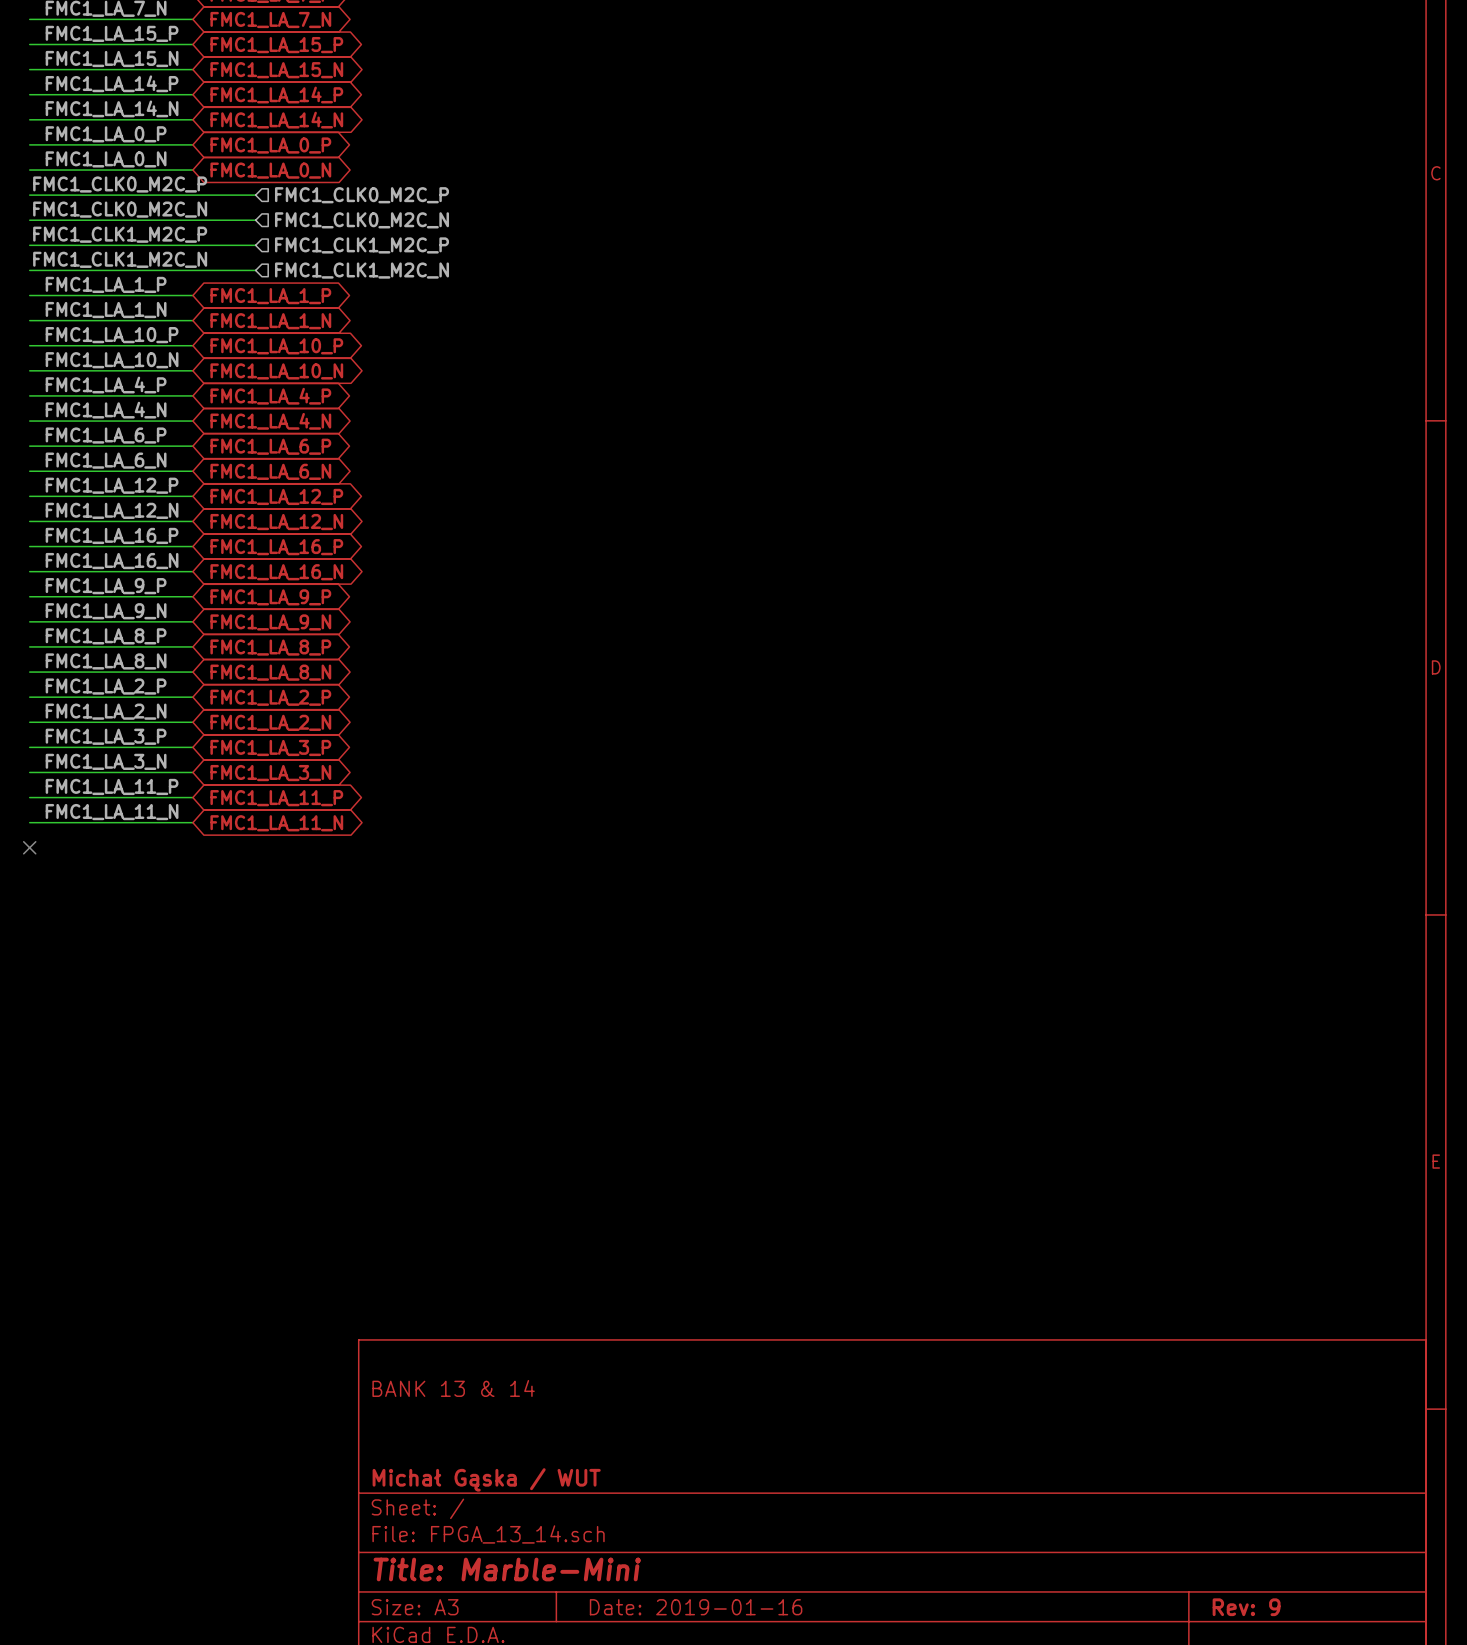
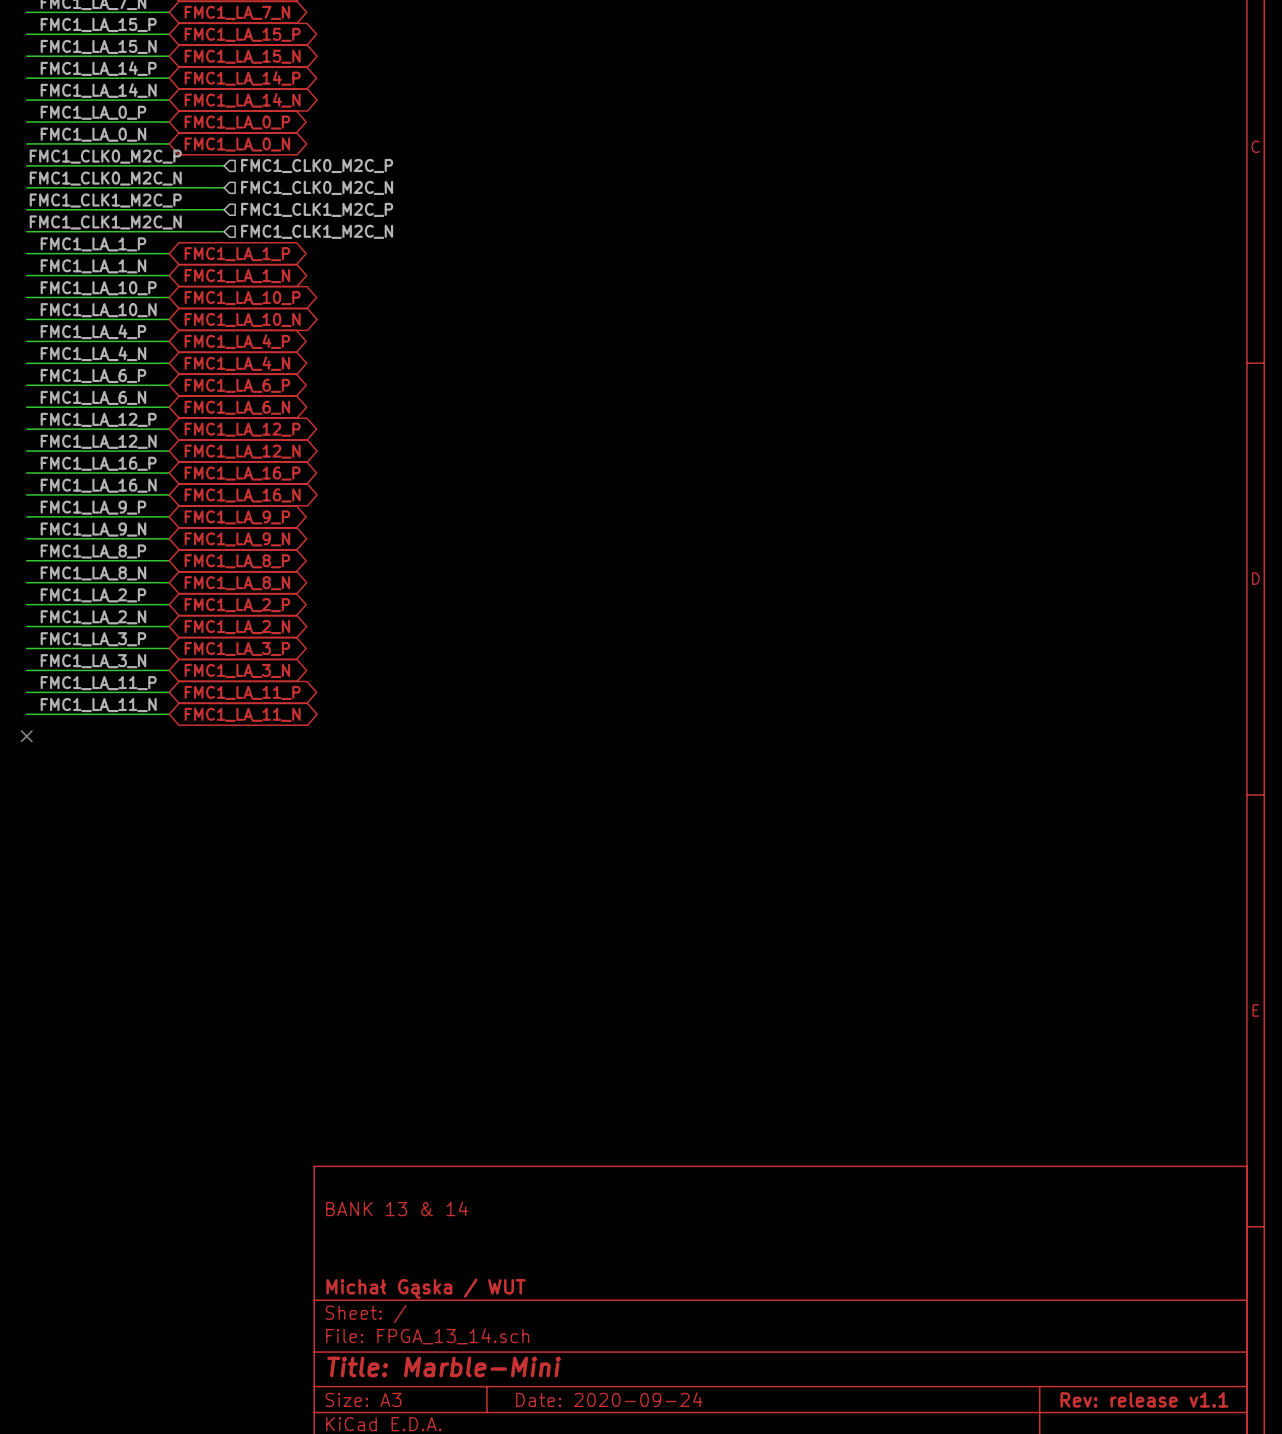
title block: Date: 2019-01-16 (696, 1607) -> Date: 2020-09-24 (609, 1399)
title block: Rev: 9 (1246, 1607) -> Rev: release v1.1 (1144, 1399)

